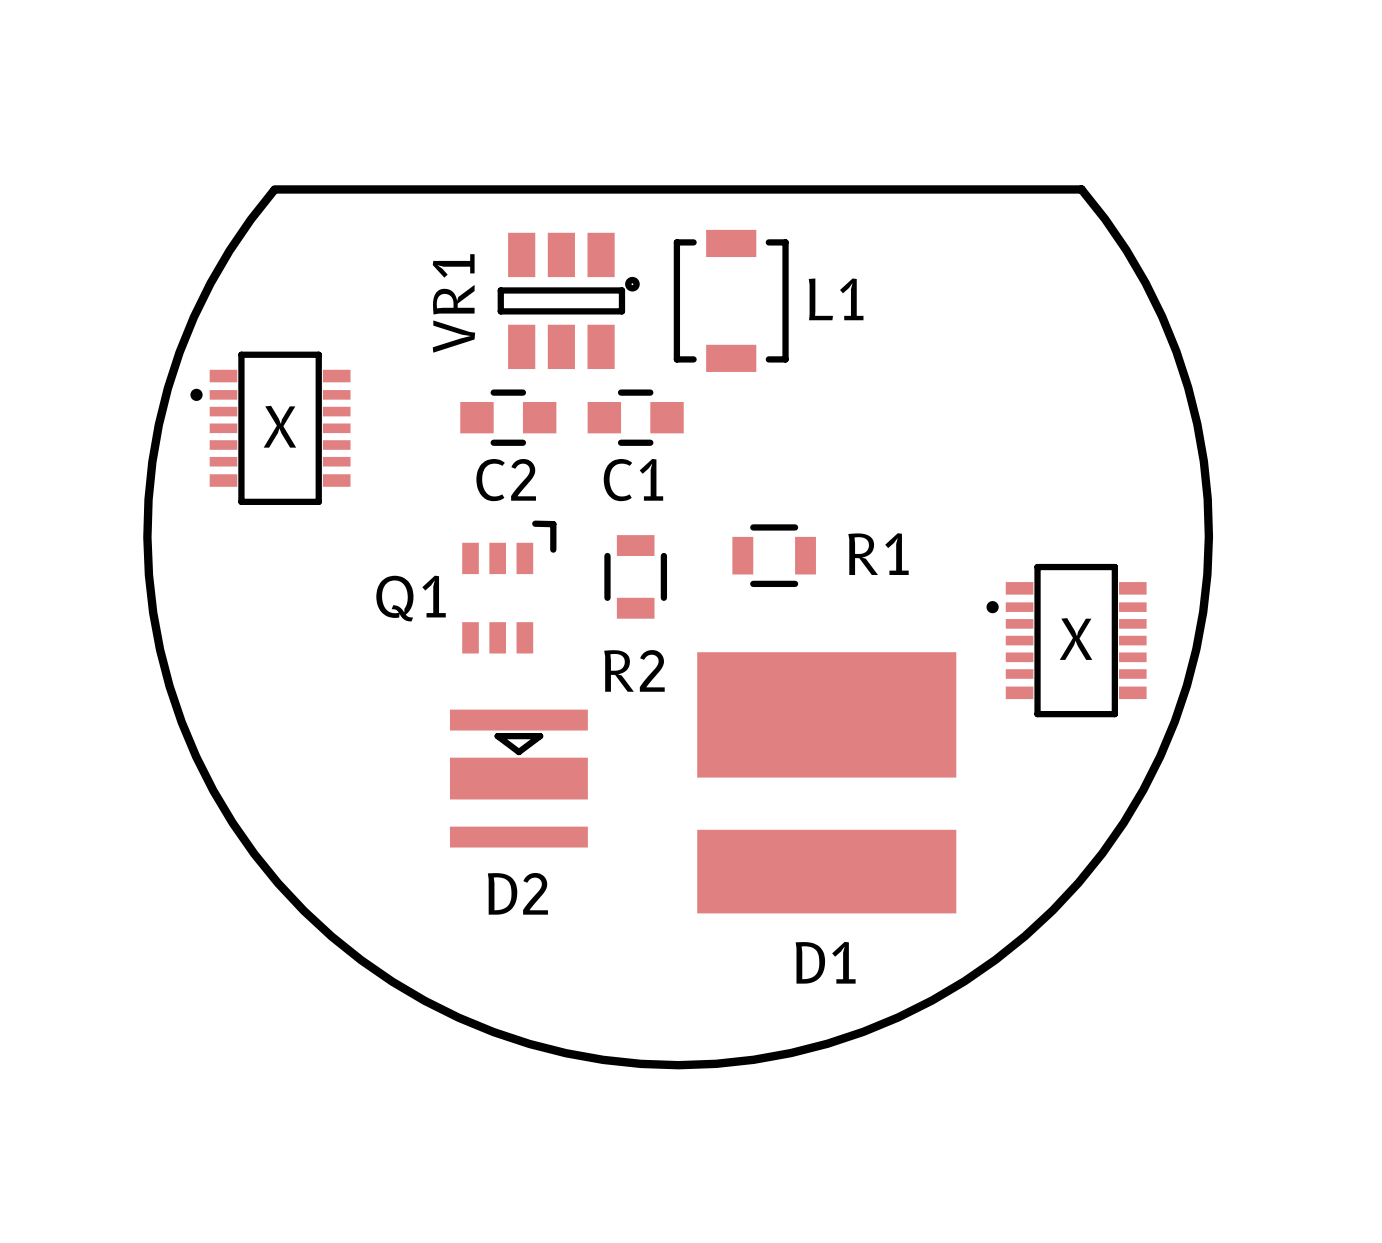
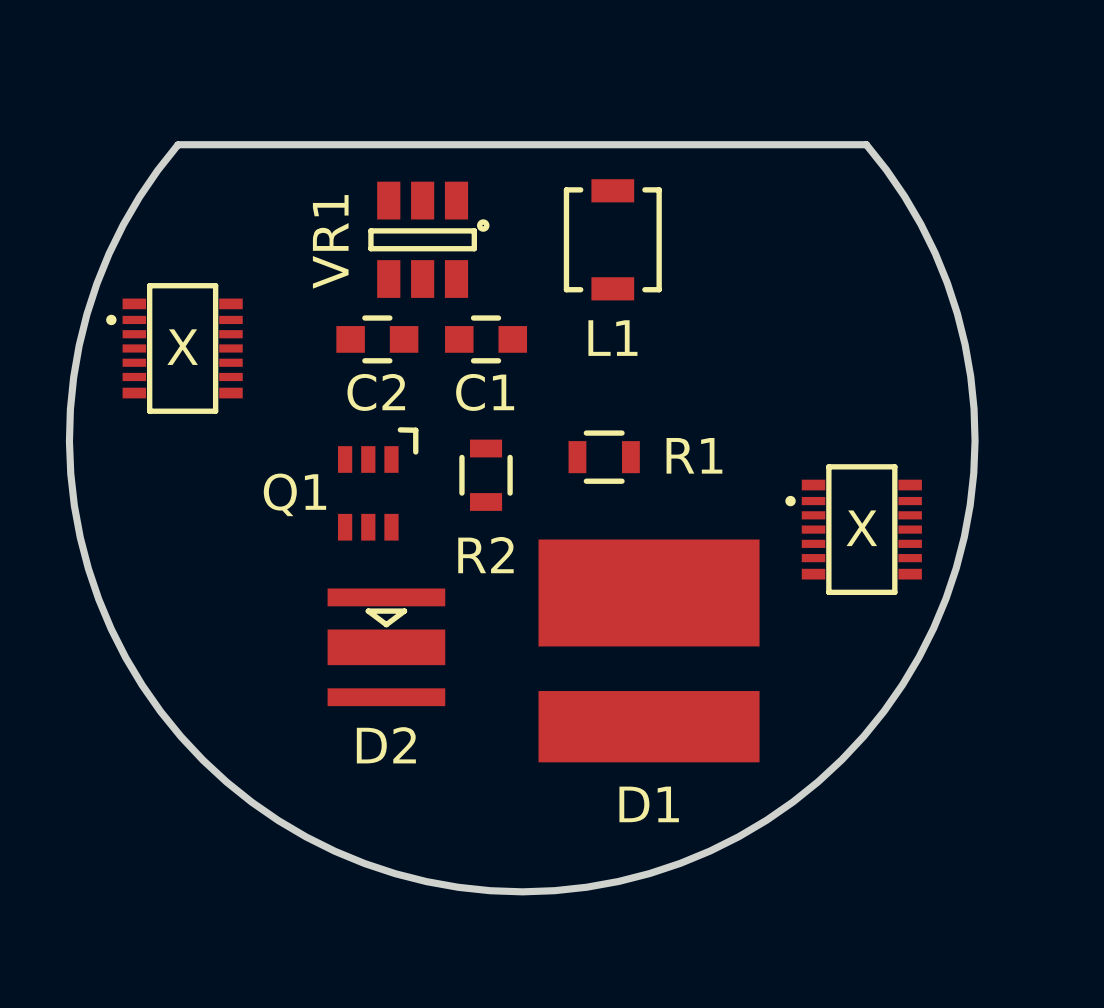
L1 name position: L1 (836, 299) -> L1 (612, 338)
L1 position: (731, 300) -> (612, 239)

